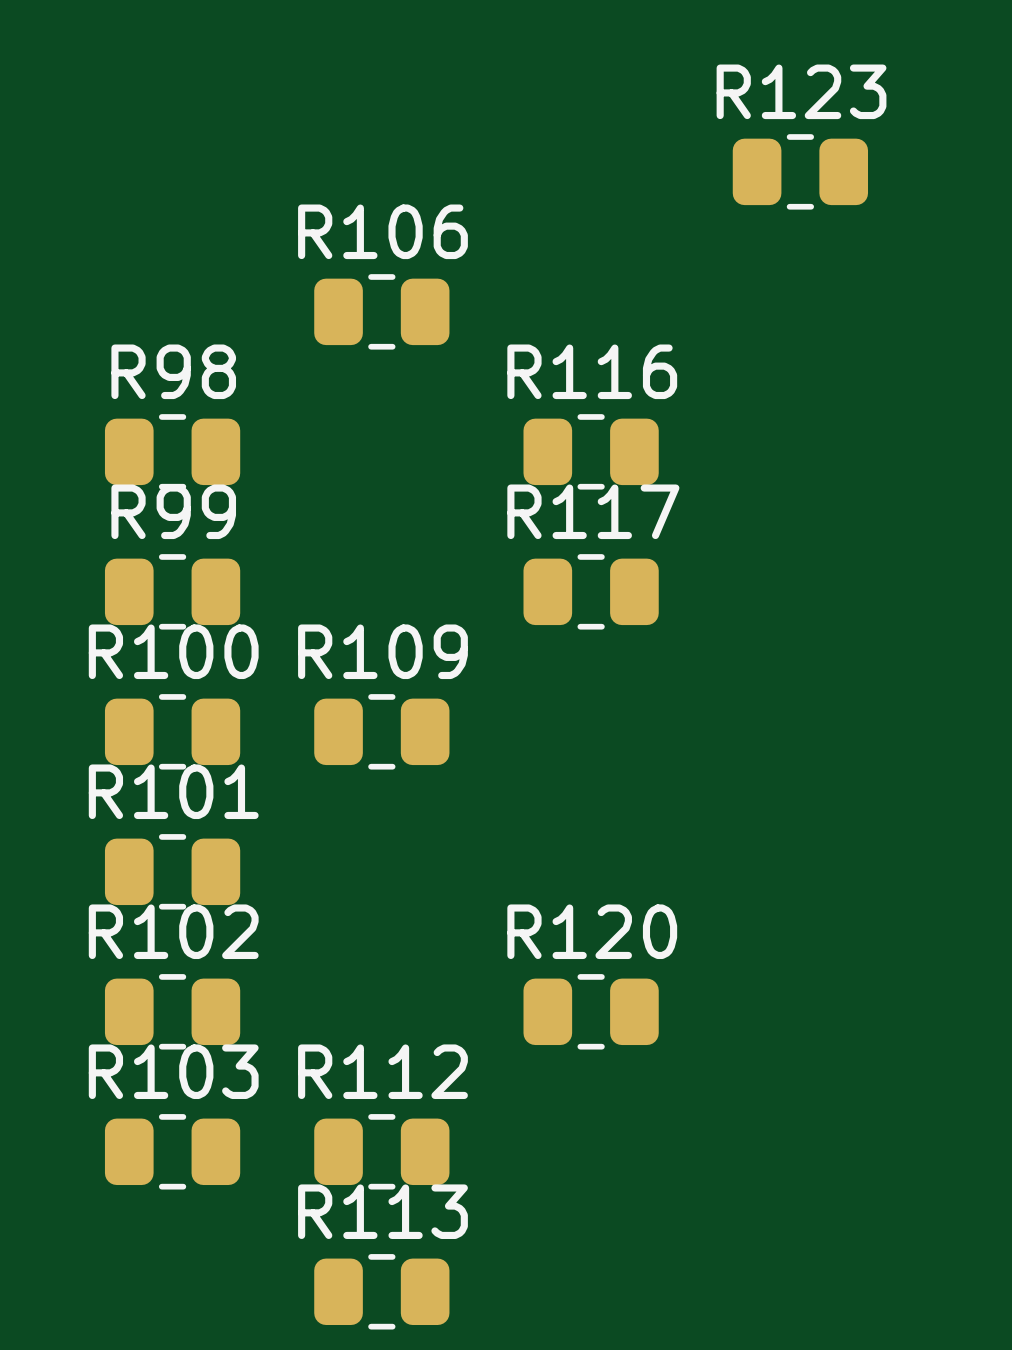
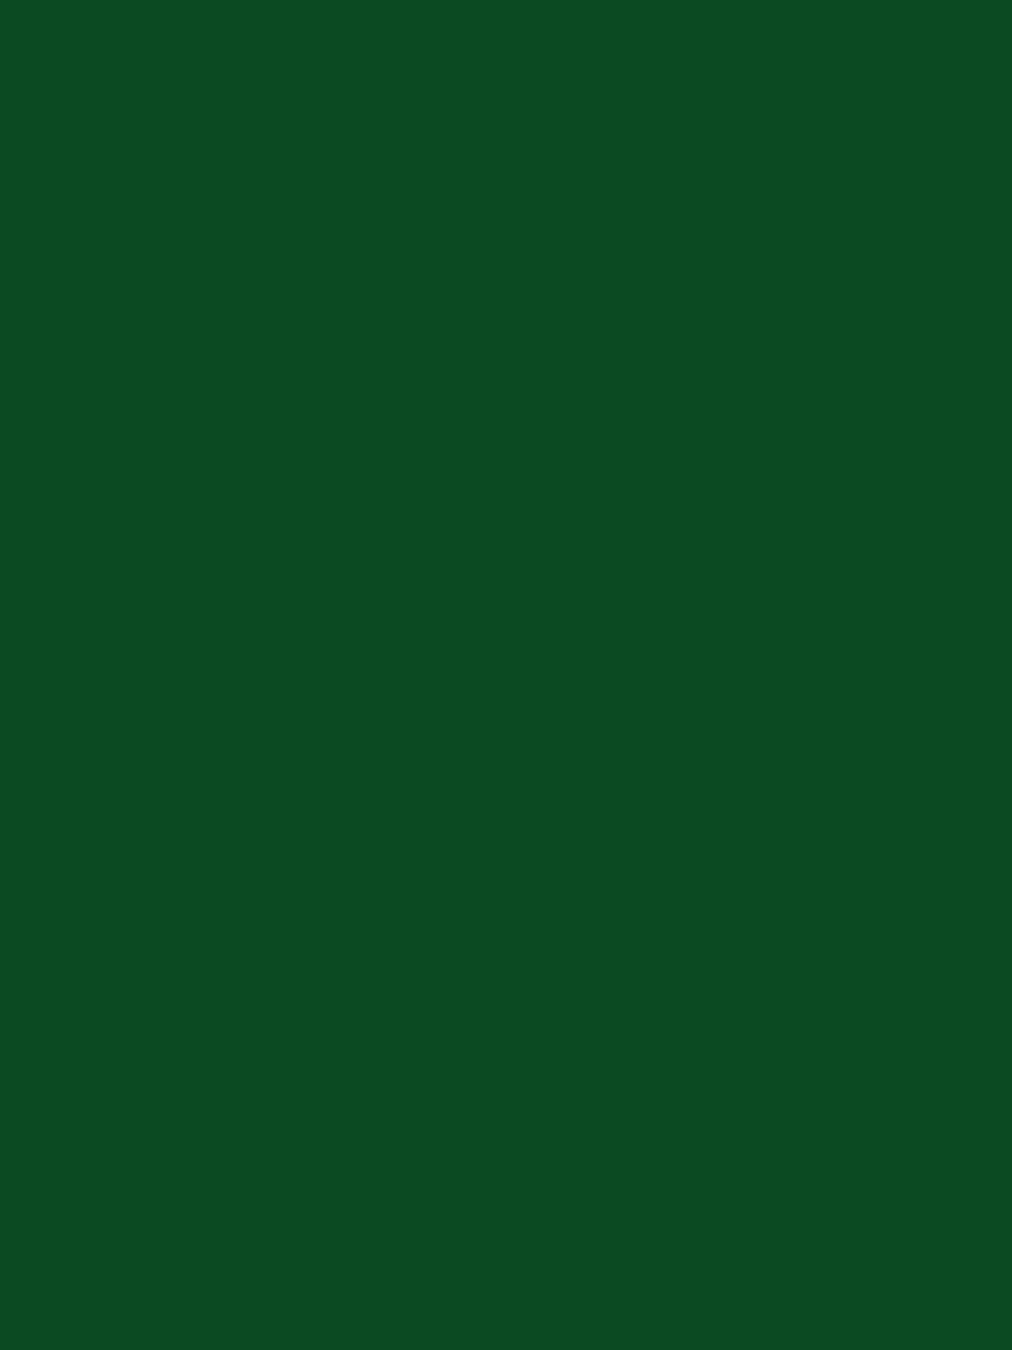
R123: (800, 171) -> none
R106: (381, 311) -> none
R98: (172, 451) -> none
R116: (591, 451) -> none
R99: (172, 591) -> none
R117: (591, 591) -> none
R100: (172, 731) -> none
R109: (381, 731) -> none
R101: (172, 871) -> none
R102: (172, 1011) -> none
R120: (591, 1011) -> none
R103: (172, 1151) -> none
R112: (381, 1151) -> none
R113: (381, 1291) -> none

